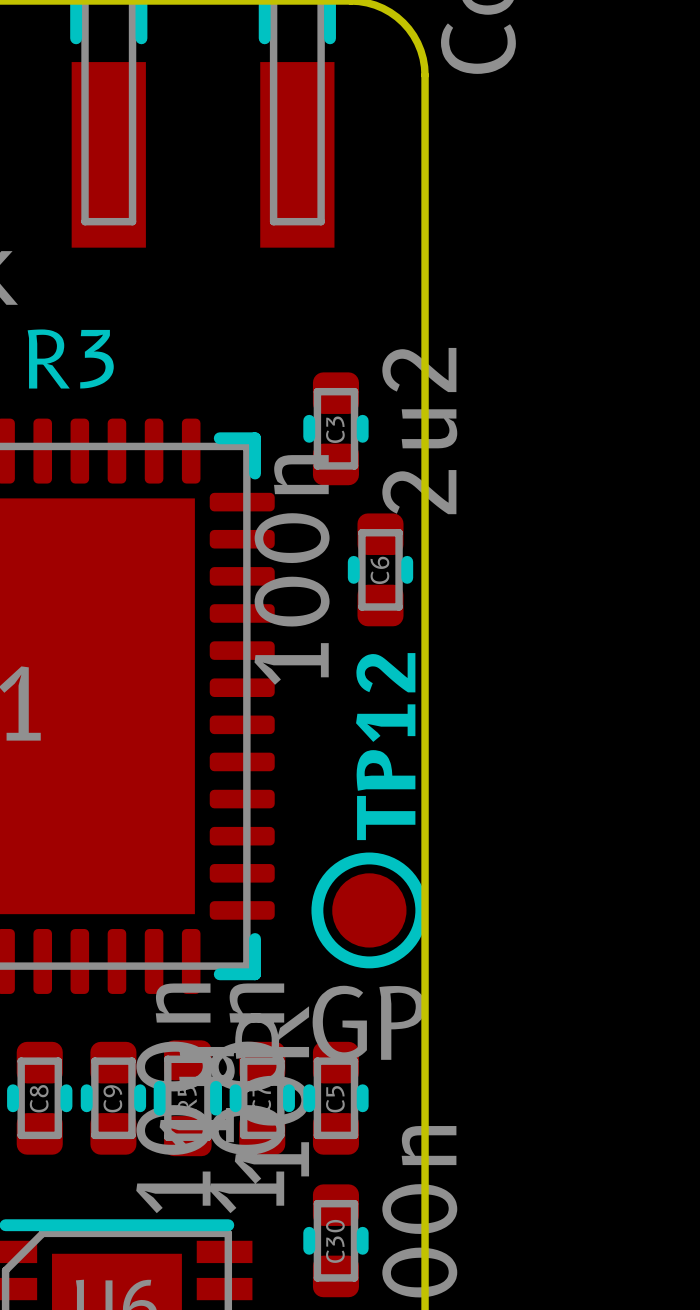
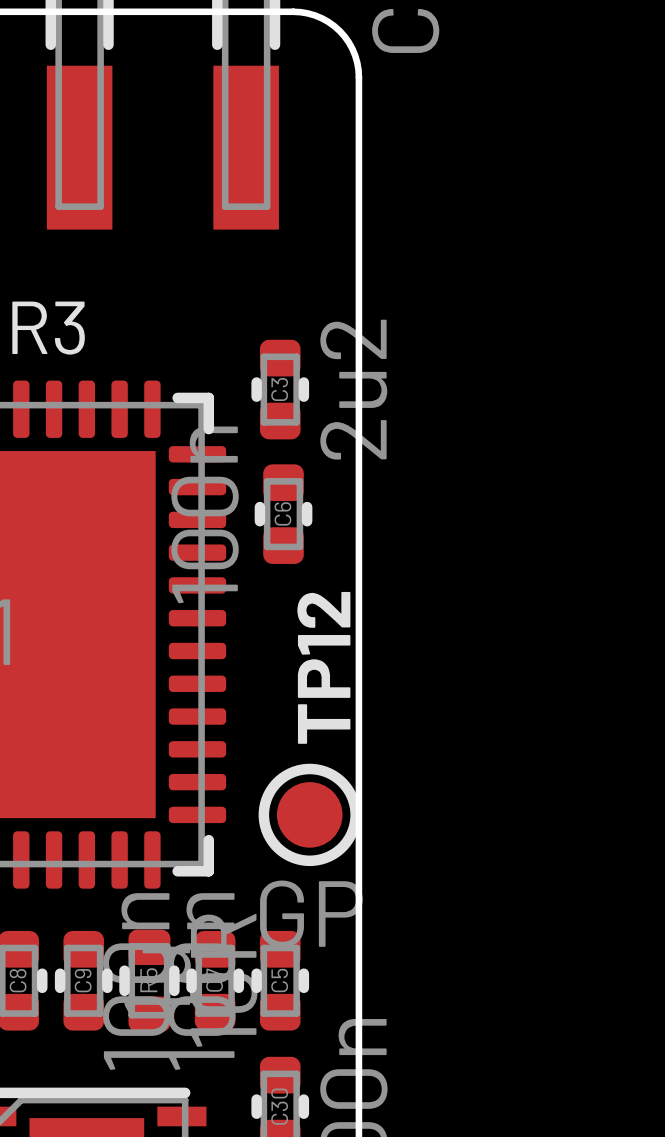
C6 position: (380, 569) -> (283, 514)

